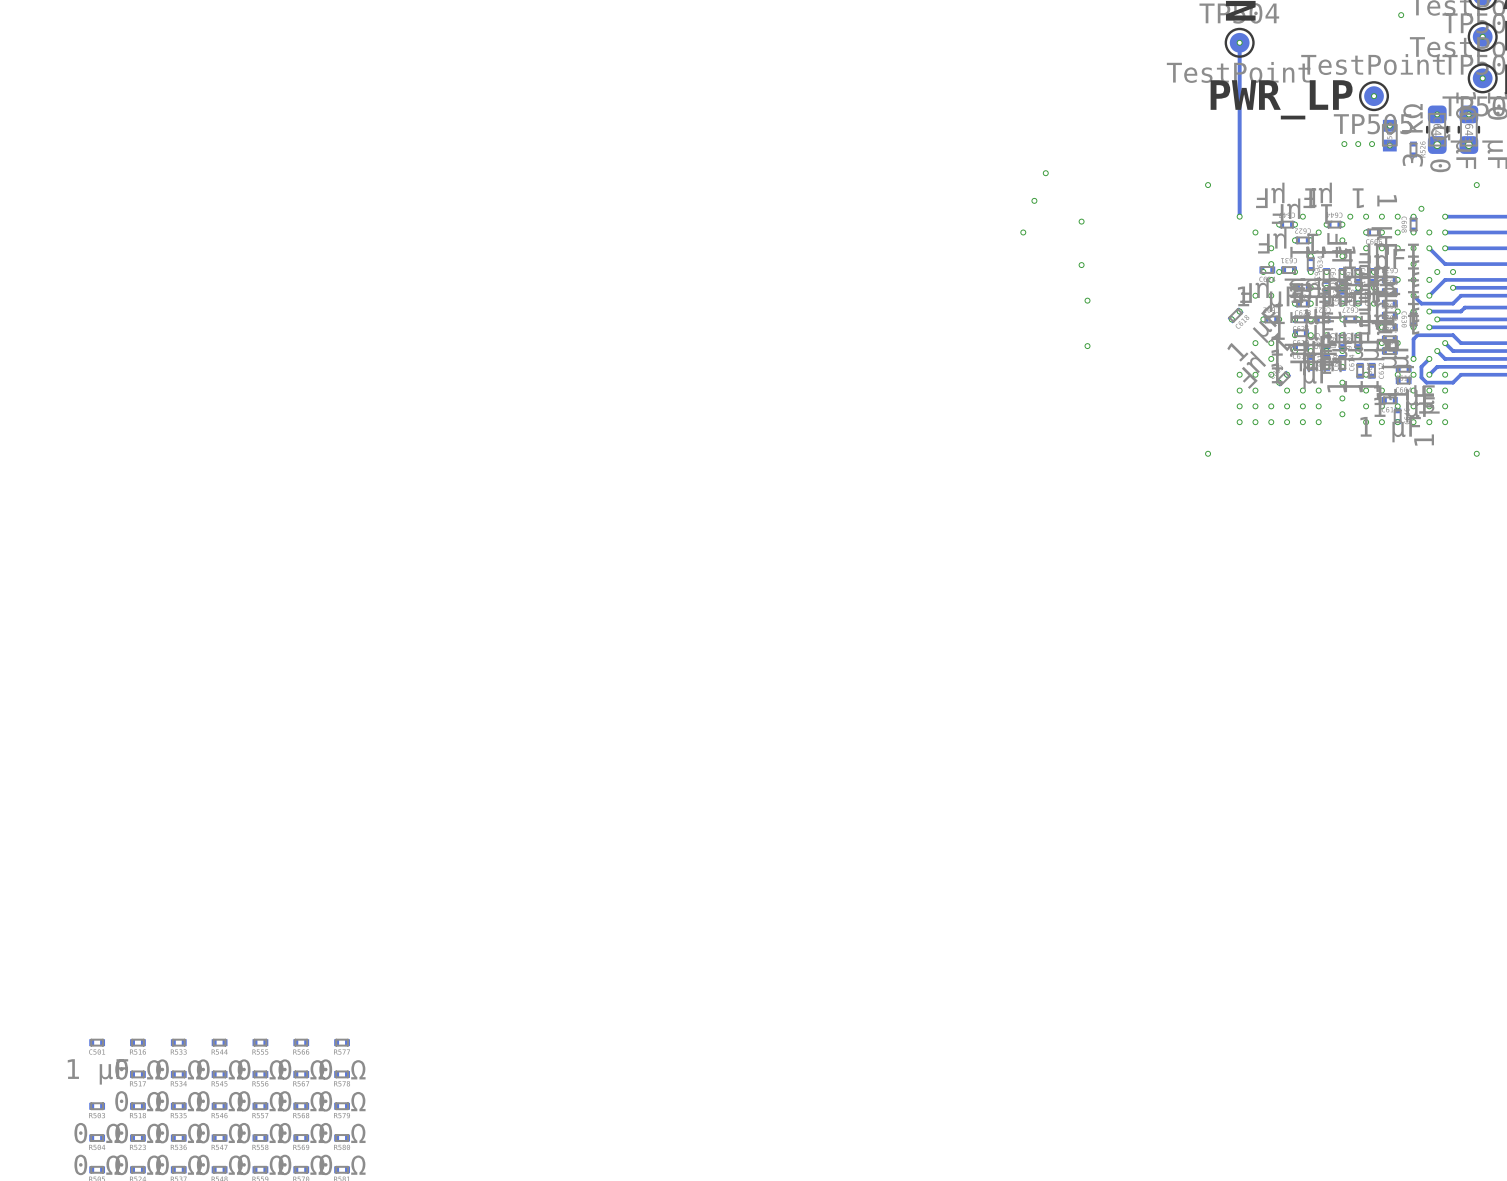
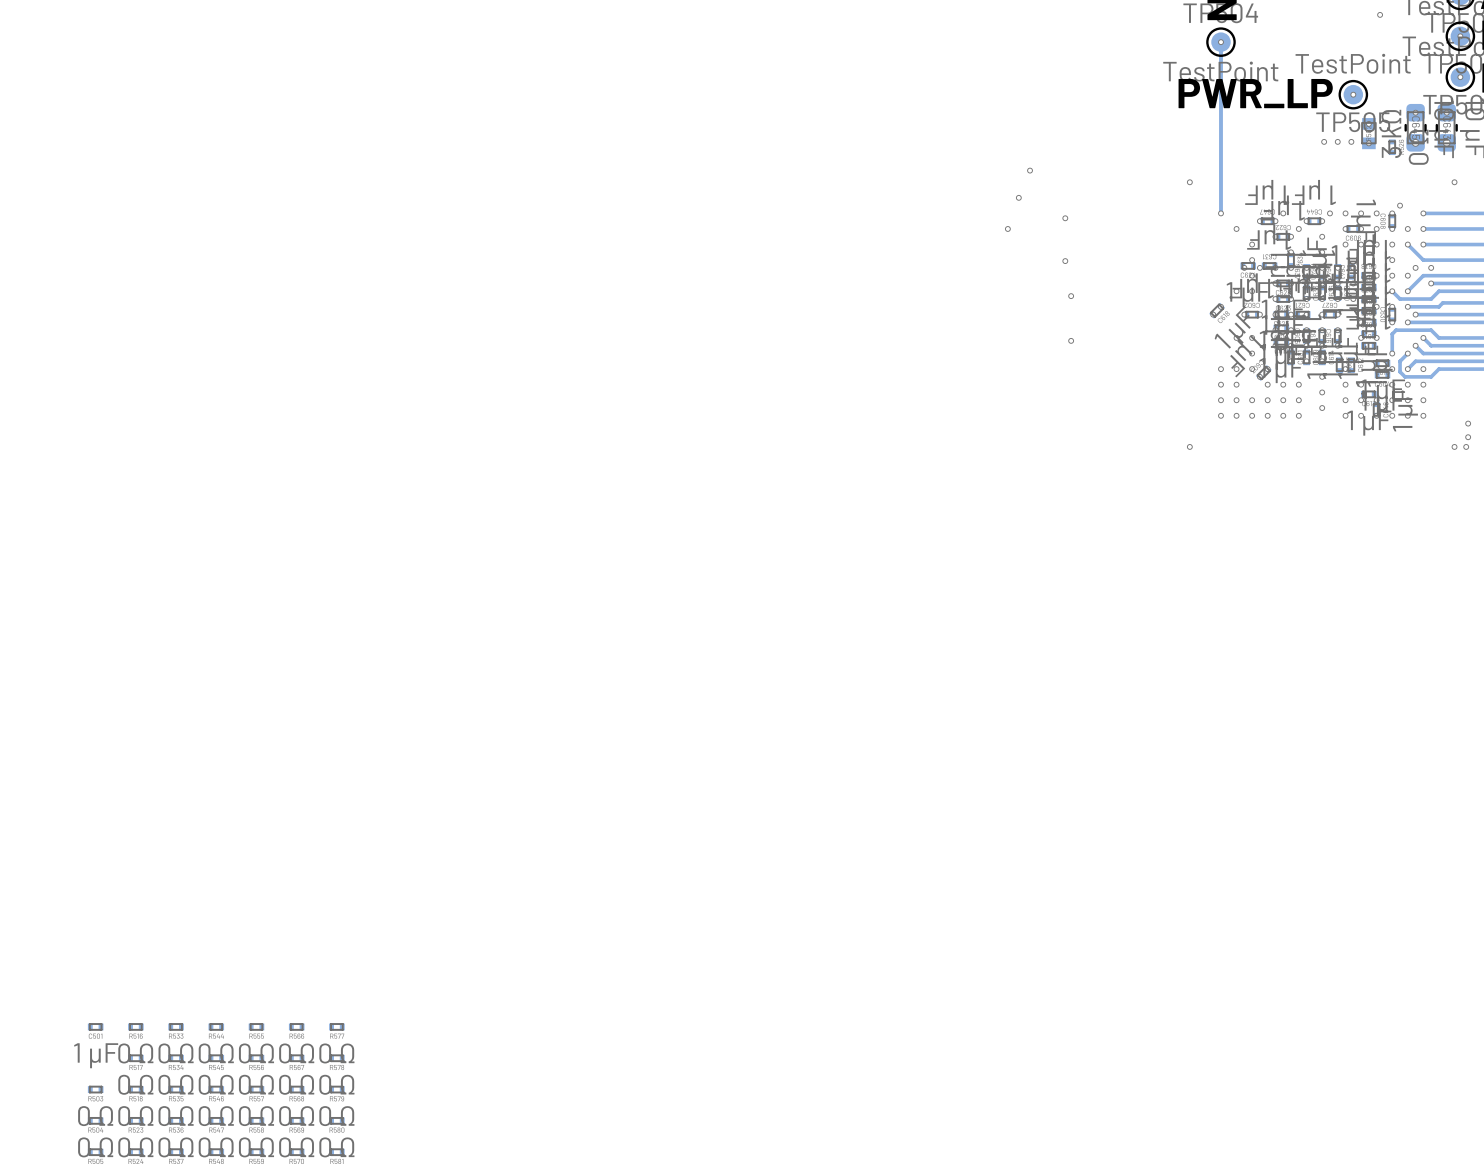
via: none -> (1468, 423)
via: none -> (1468, 437)
via: none -> (1466, 446)

